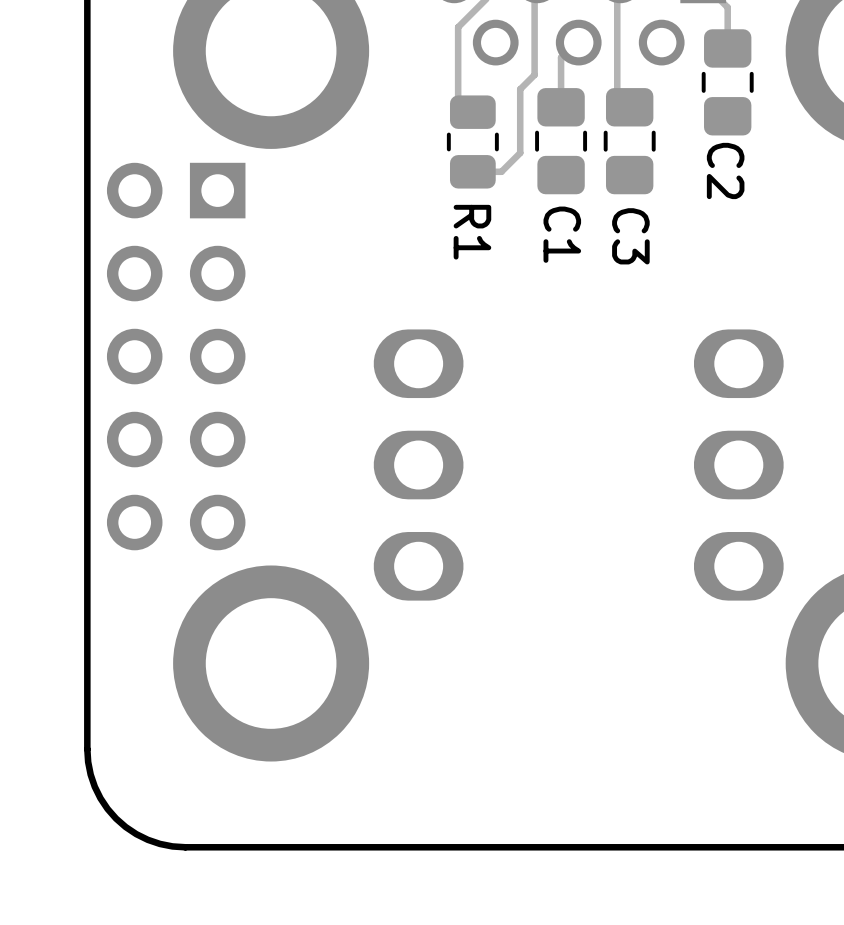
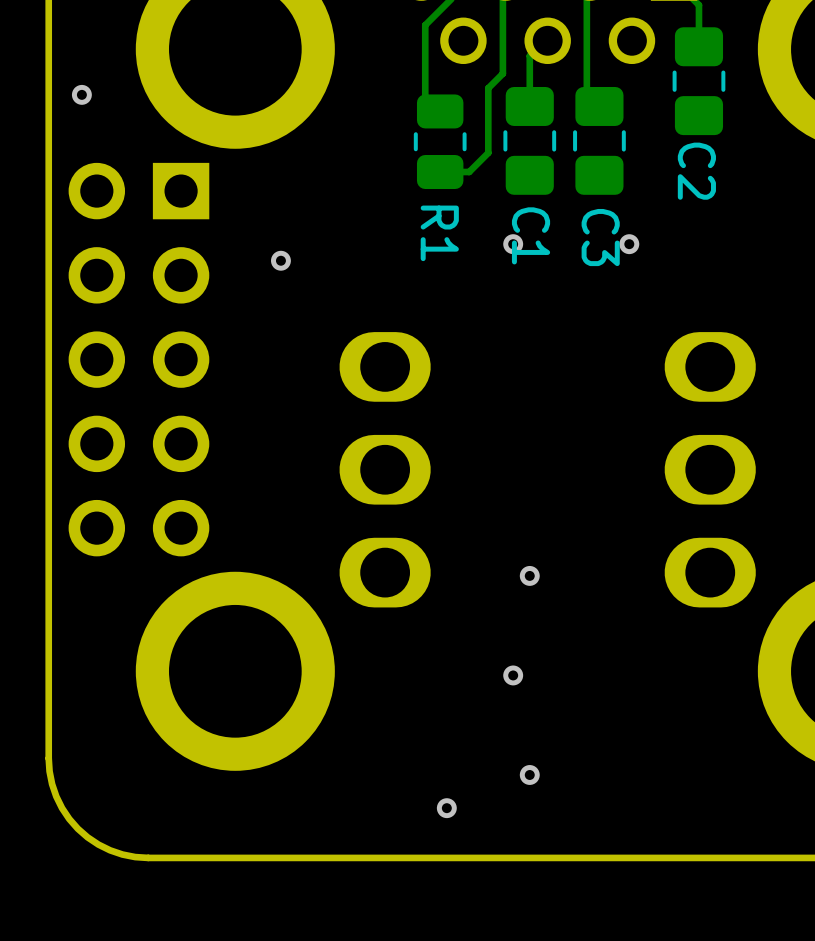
via: none -> (81, 94)
via: none -> (513, 244)
via: none -> (629, 244)
via: none -> (280, 260)
via: none -> (529, 575)
via: none -> (513, 675)
via: none -> (529, 774)
via: none -> (446, 808)

